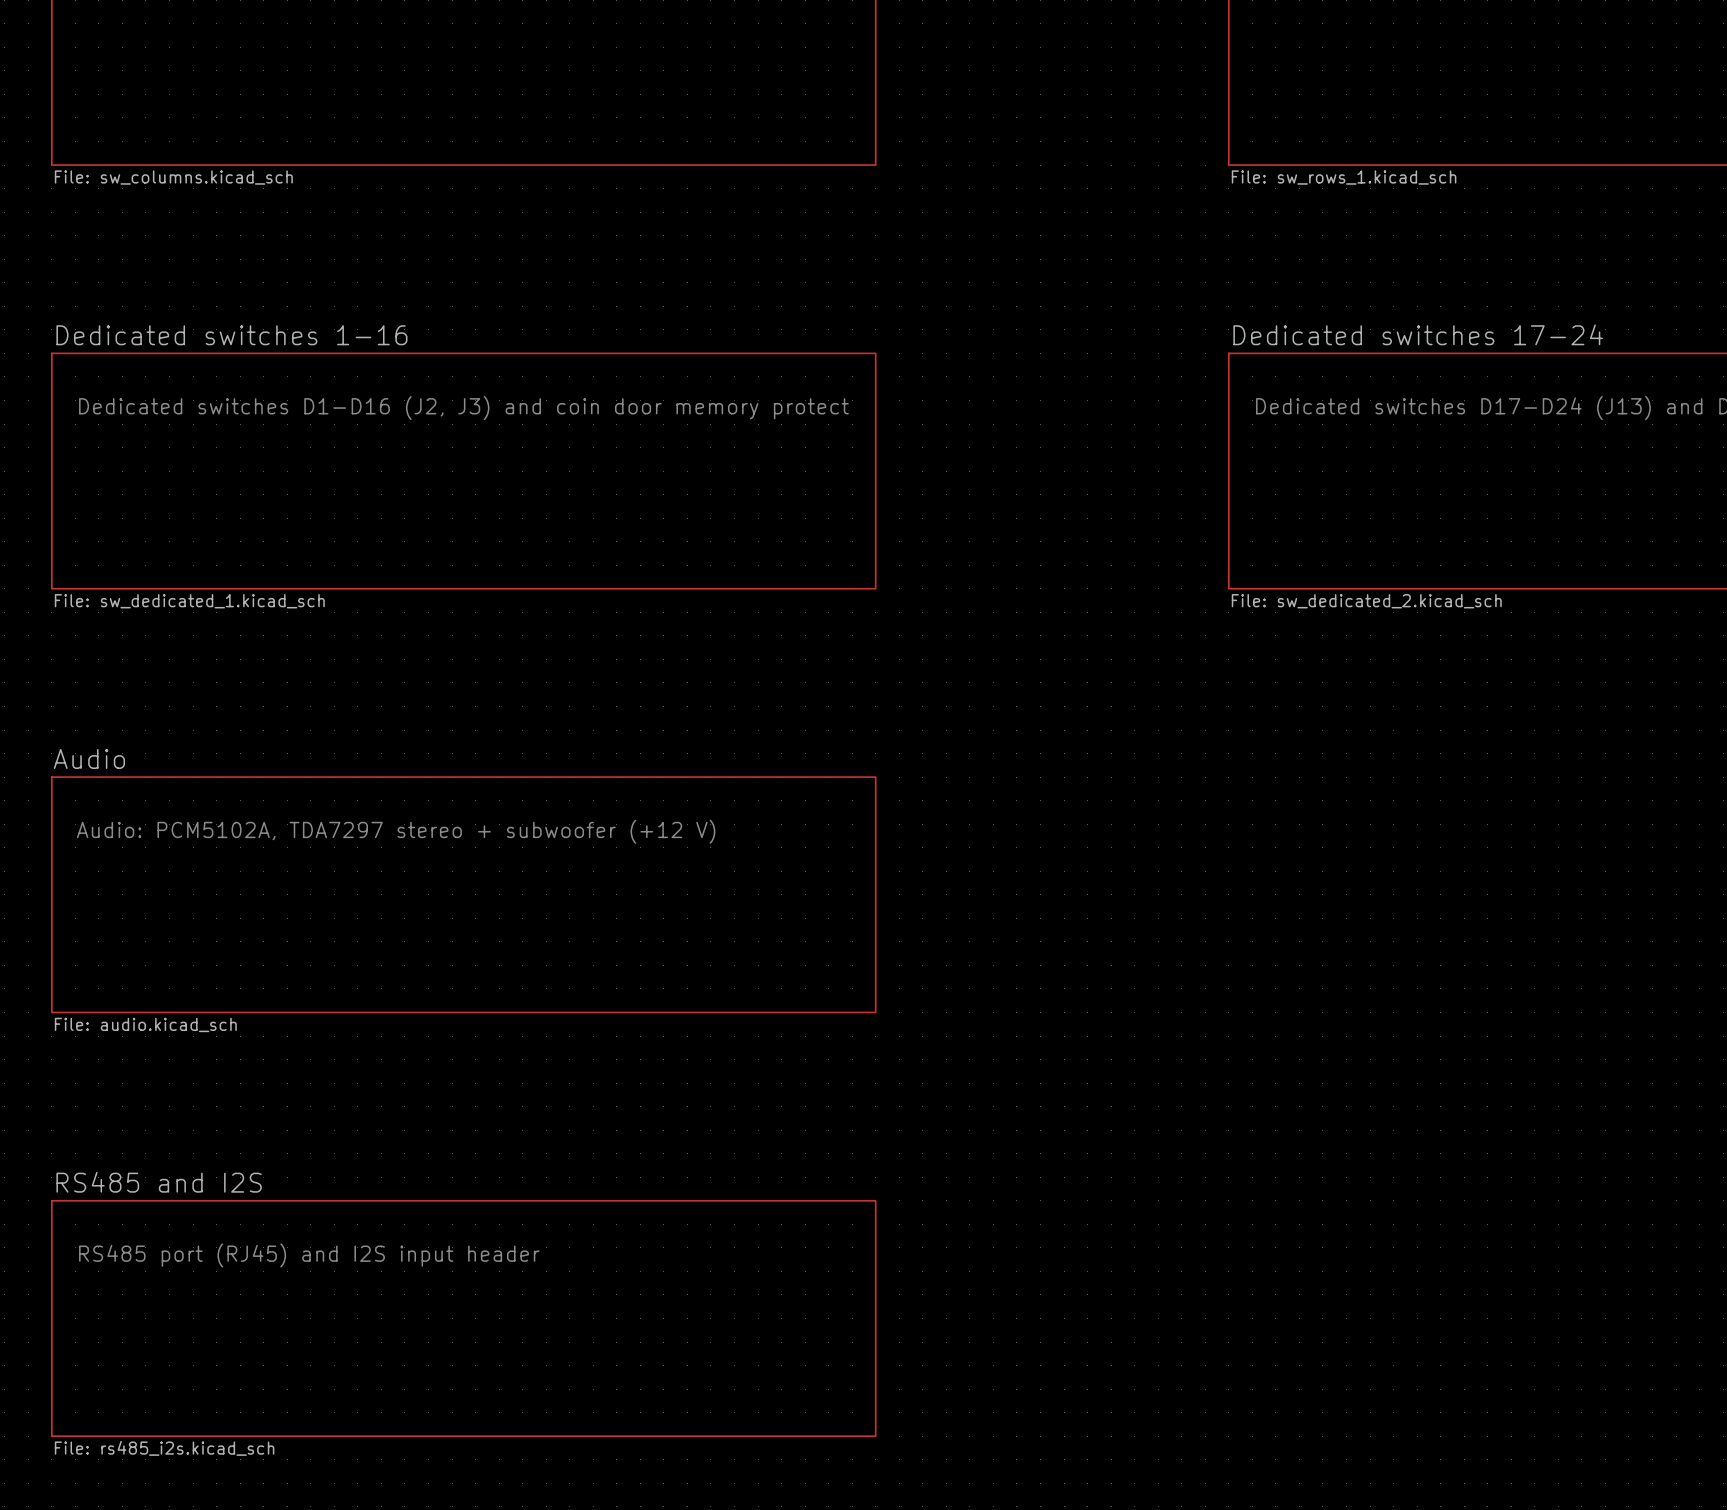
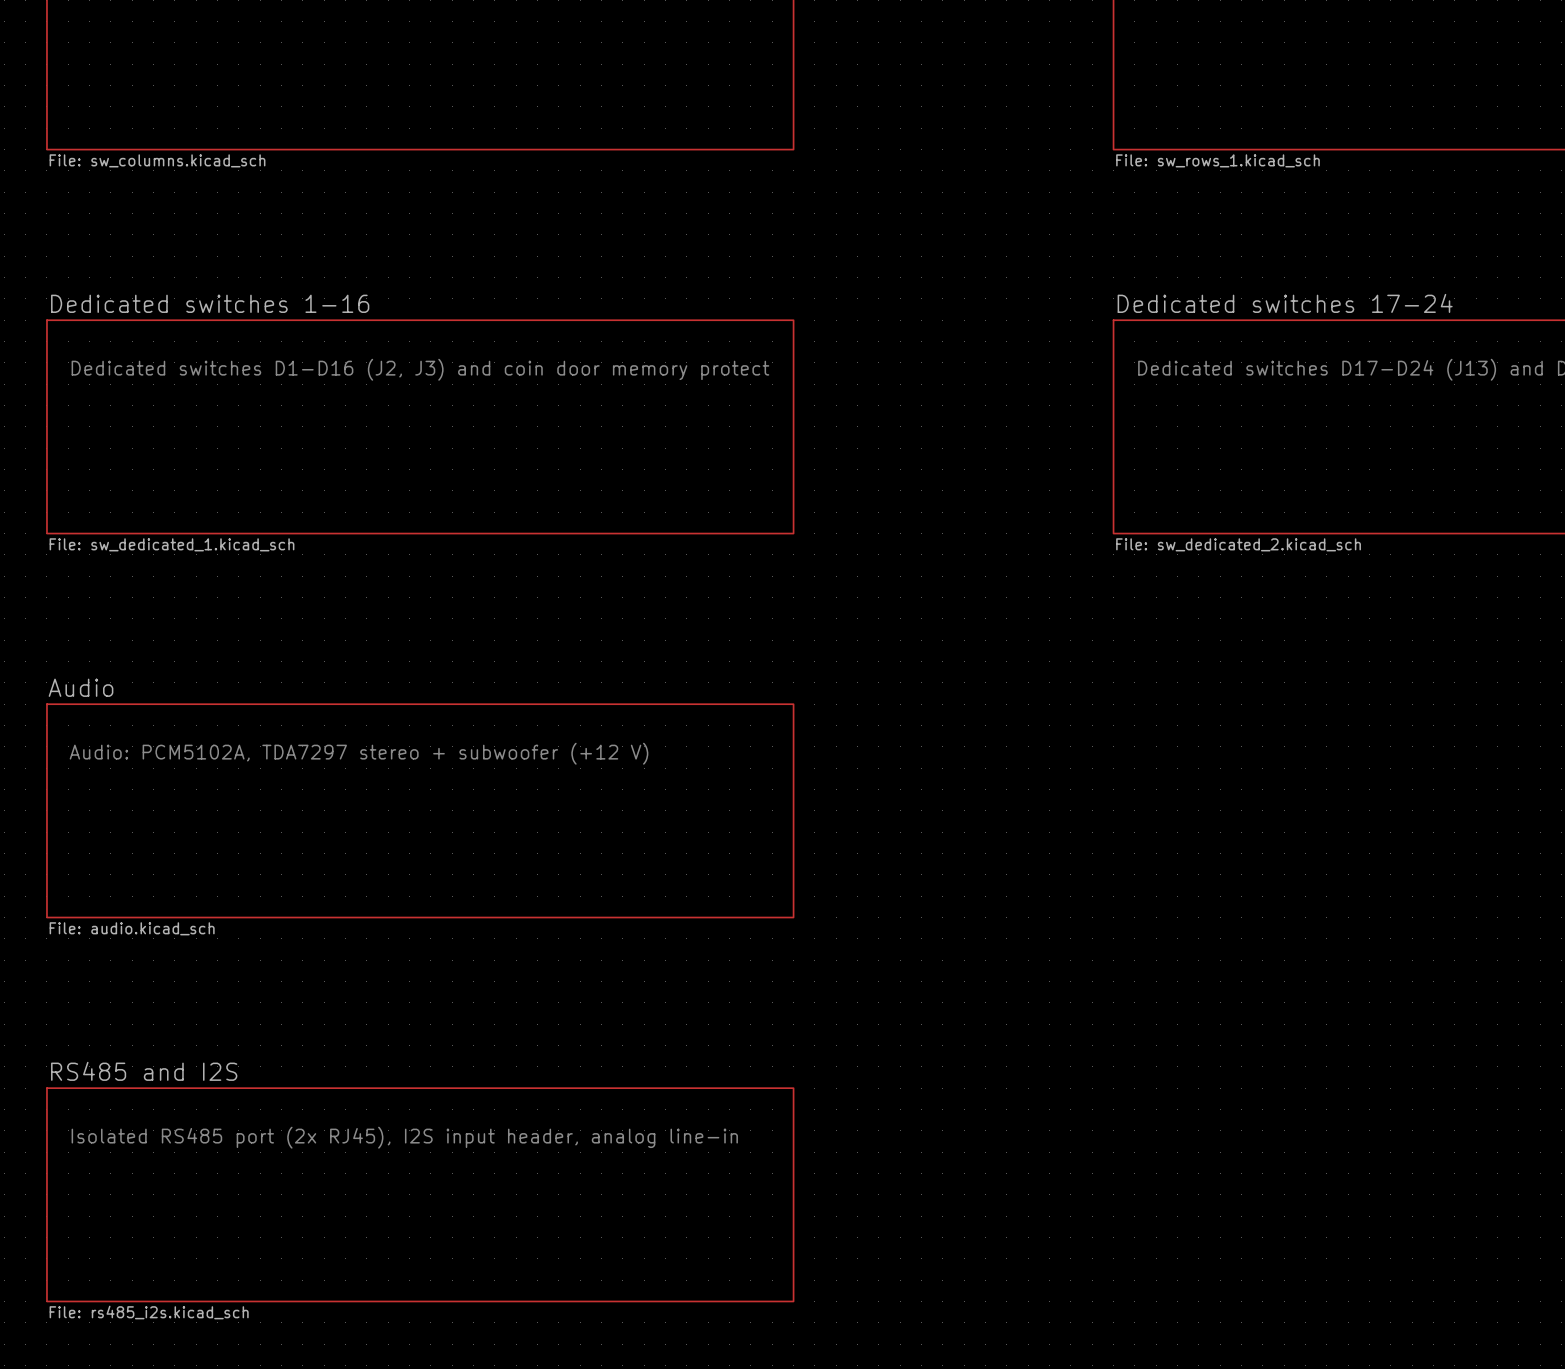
text: RS485 port (RJ45) and I2S input header (309, 1255) -> Isolated RS485 port (2x RJ45), I2S input header, analog line-in (404, 1137)

